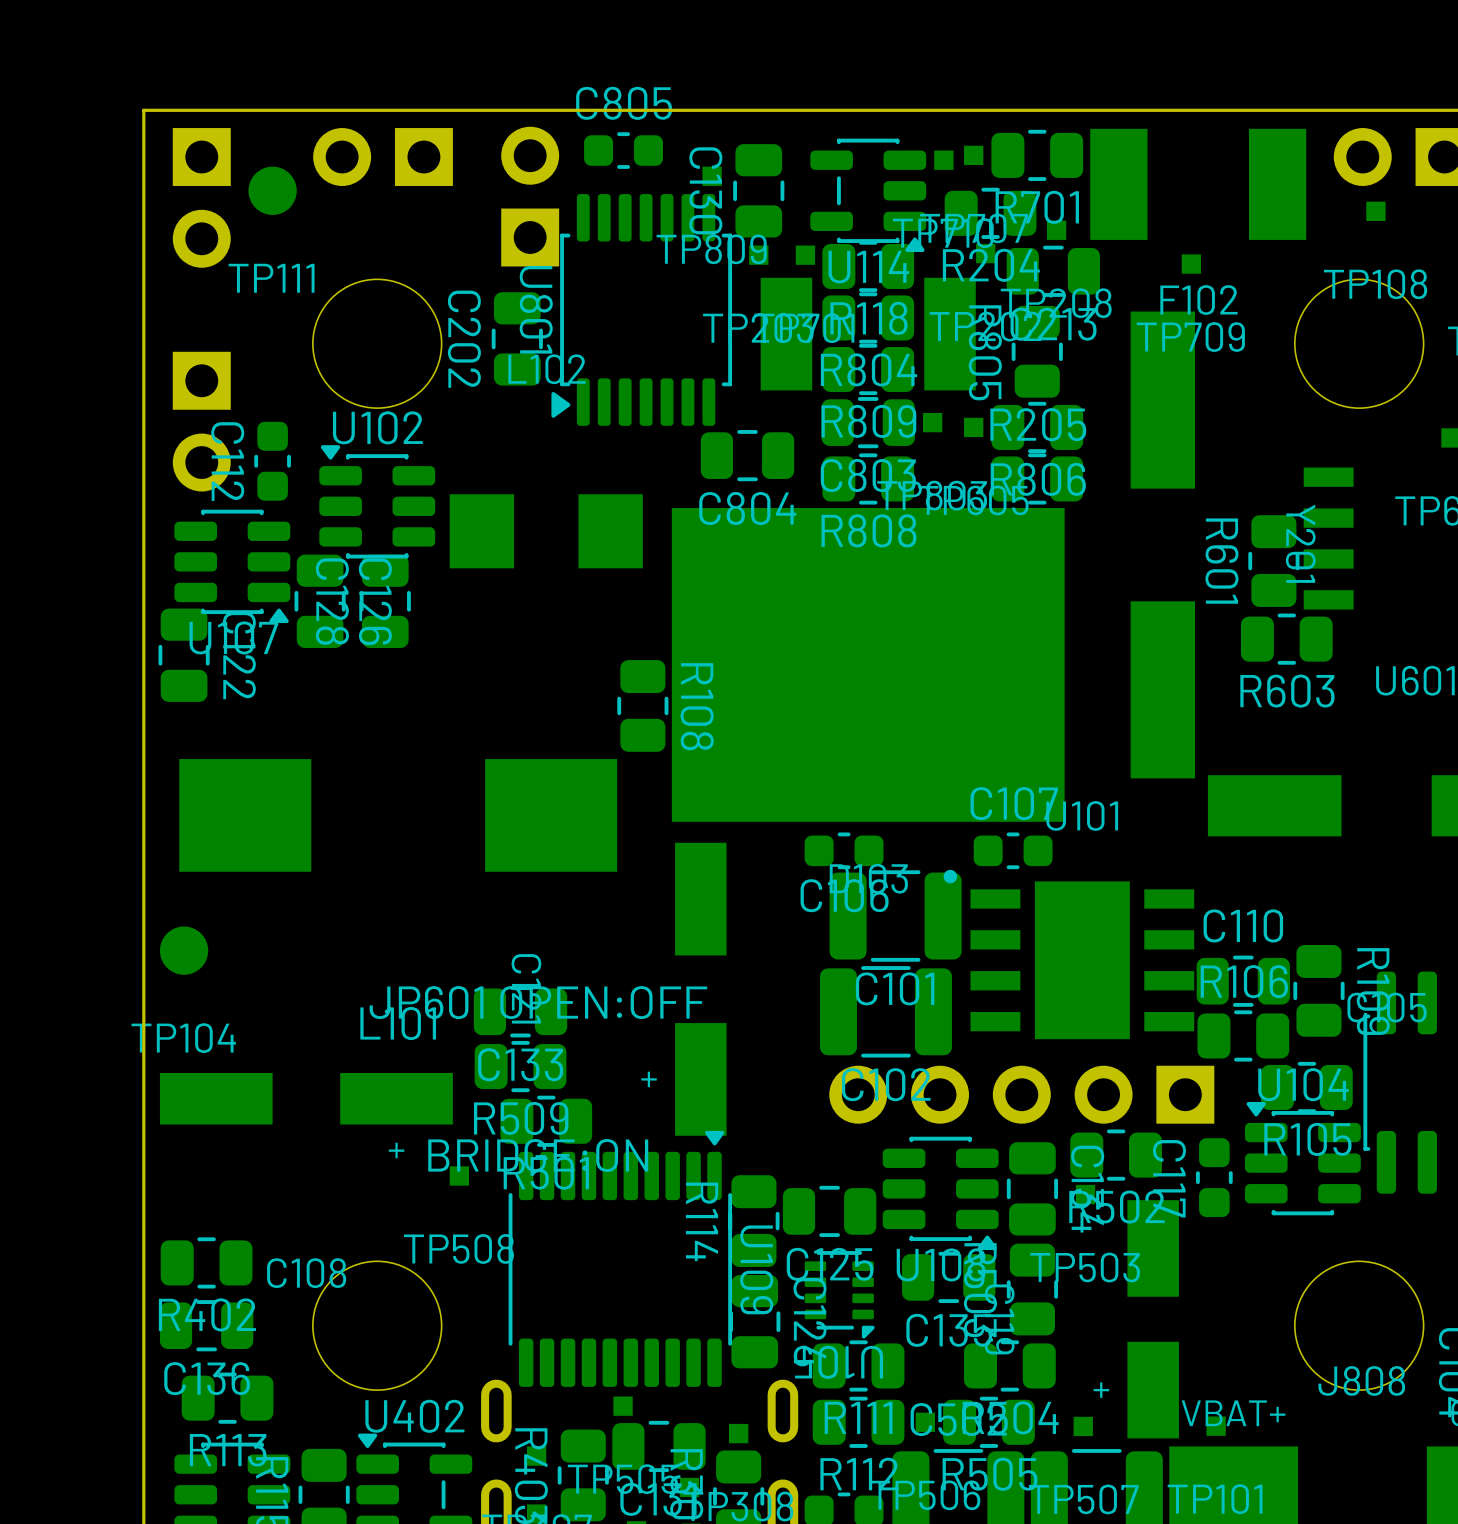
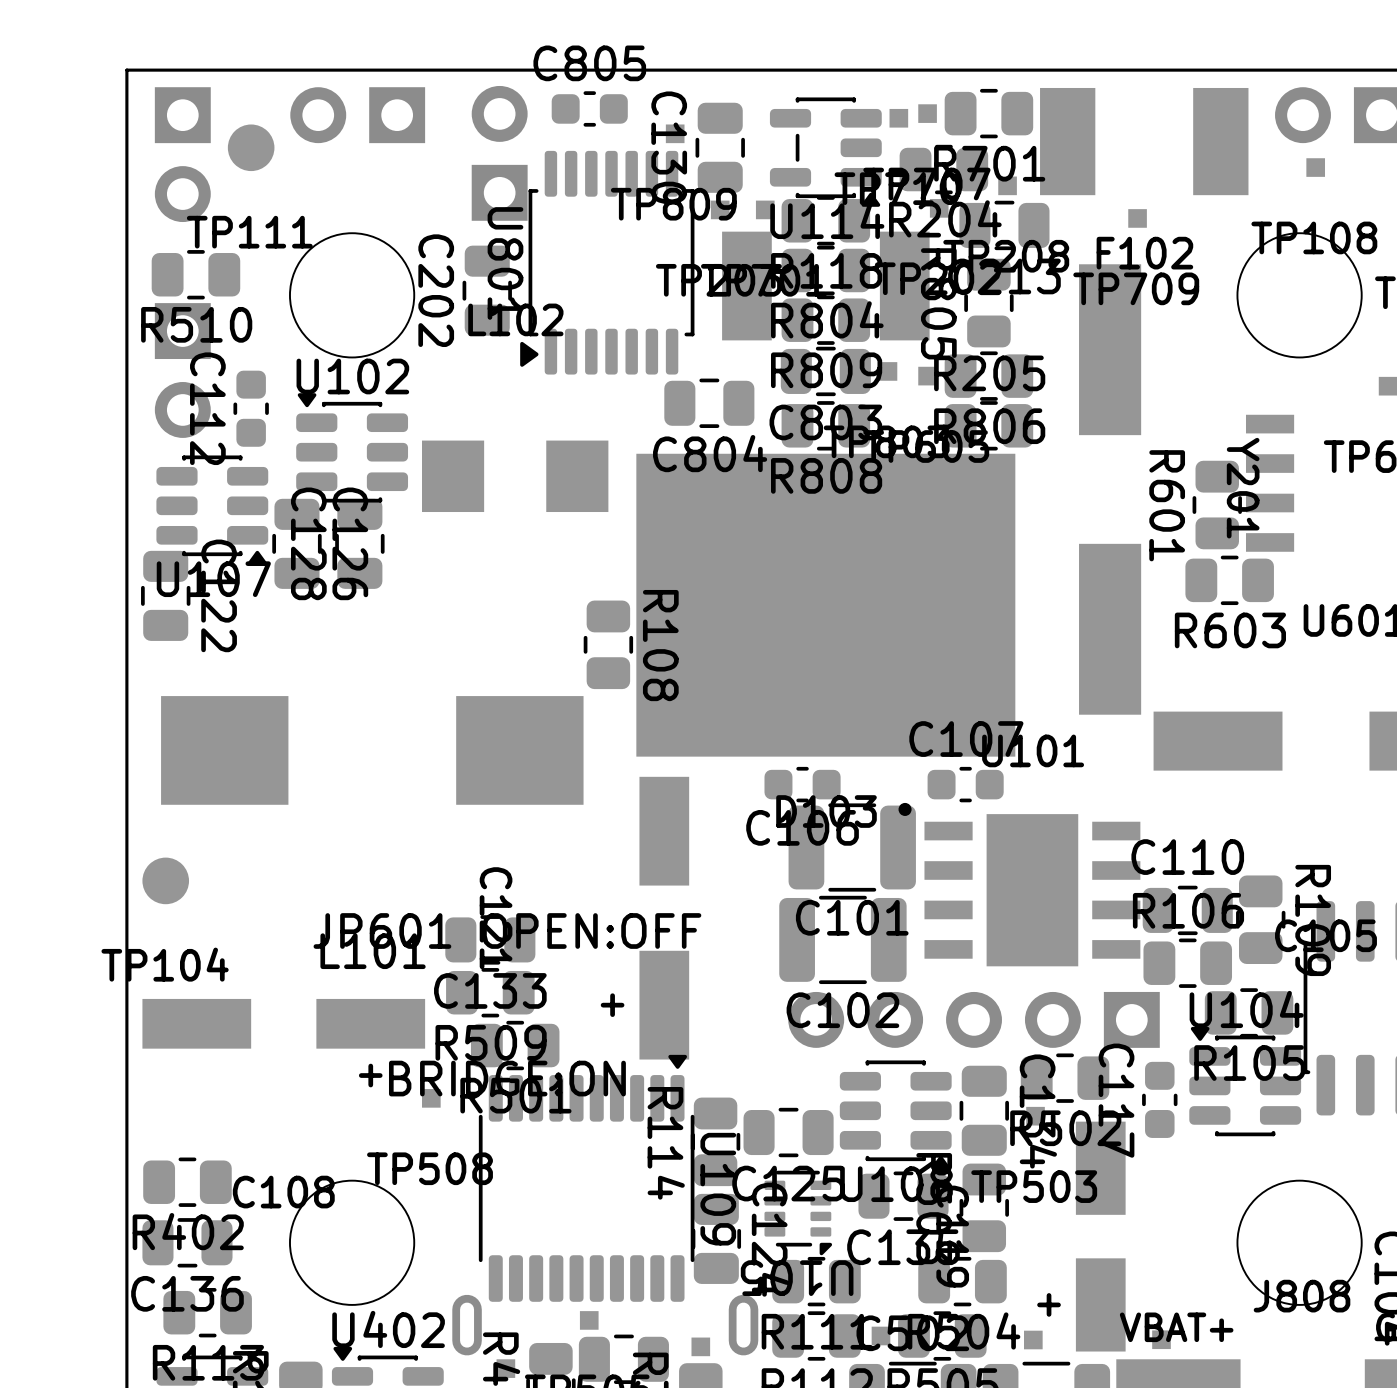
R510: none -> (195, 274)

